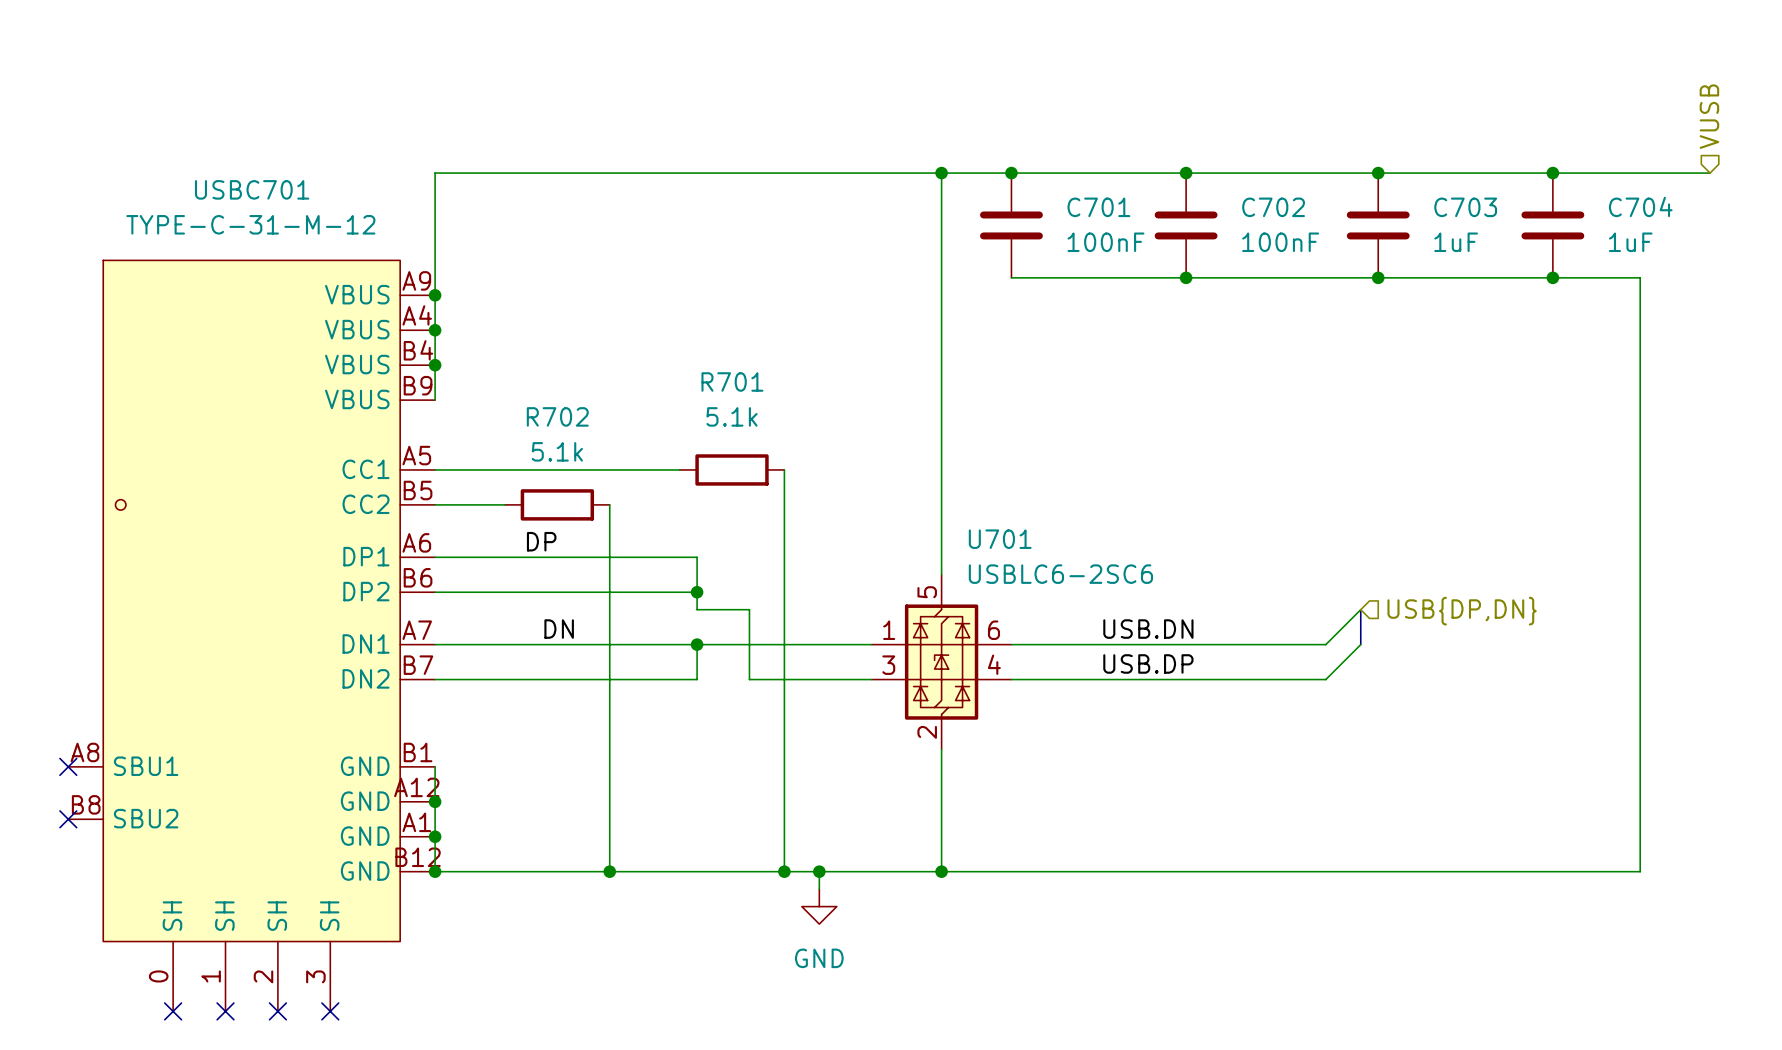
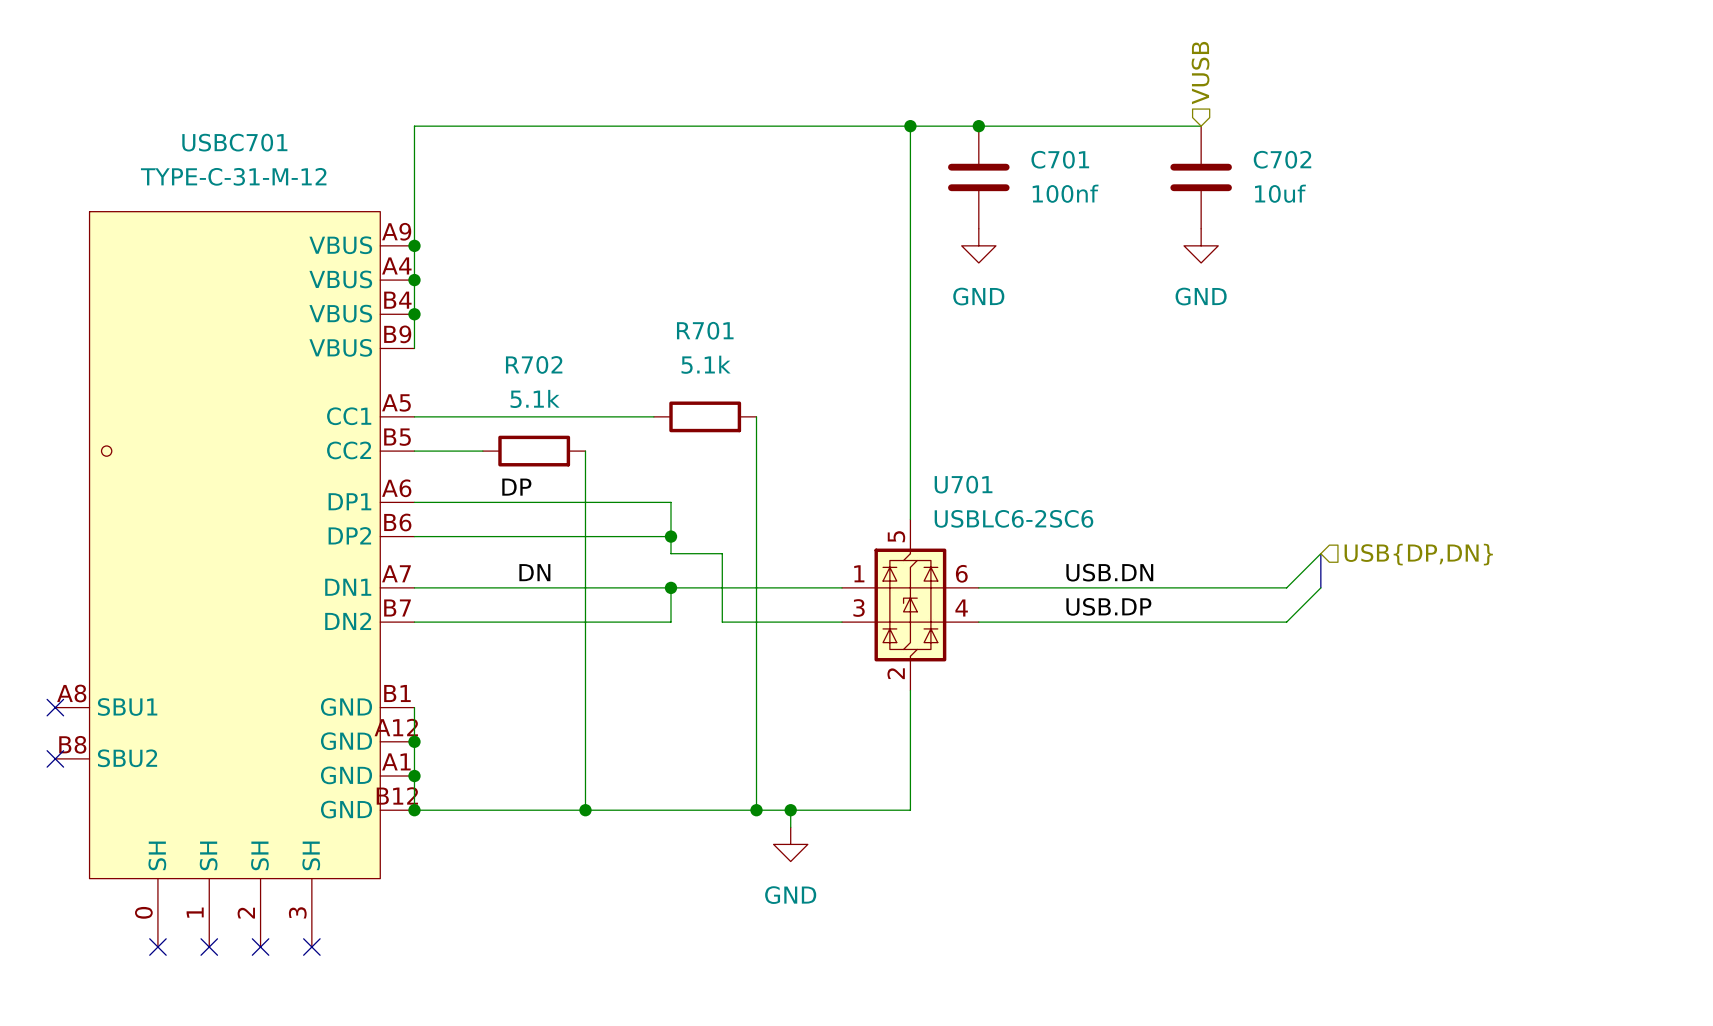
hierarchical label: none -> VUSB (1200, 73)
hierarchical label: VUSB (1709, 116) -> none
junction: (1186, 173) -> none
wire: (1238, 173) (1710, 173) -> none
junction: (1378, 173) -> none
junction: (1552, 173) -> none
C702 position: (1186, 225) -> (1201, 177)
C703: 1uF (1378, 225) -> none
C704: 1uF (1552, 225) -> none
C701 value: 100nF (1105, 242) -> 100nf (1065, 193)
C702 value: 100nF (1280, 242) -> 10uf (1280, 193)
wire: (1011, 277) (1640, 277) (1640, 871) (941, 871) -> none
junction: (1186, 277) -> none
junction: (1378, 277) -> none
junction: (1552, 277) -> none
power symbol: none -> GND (978, 245)
power symbol: none -> GND (1201, 245)
junction: (941, 871) -> none

